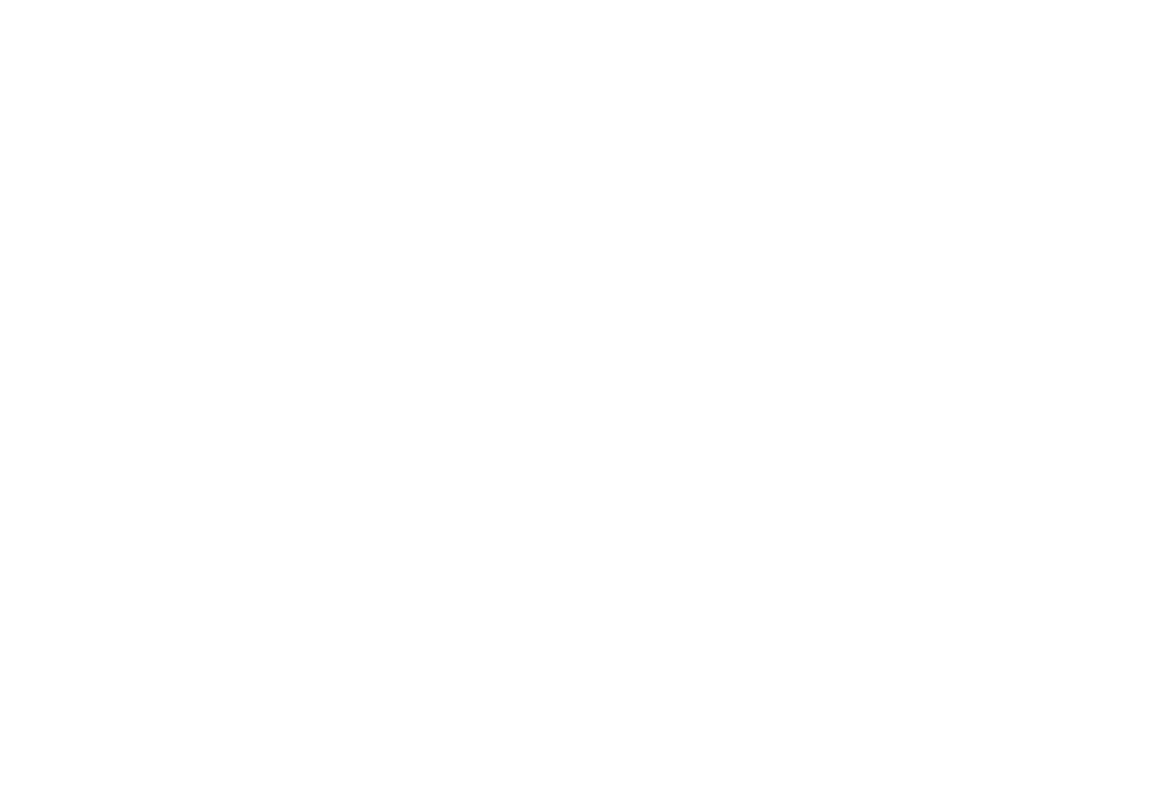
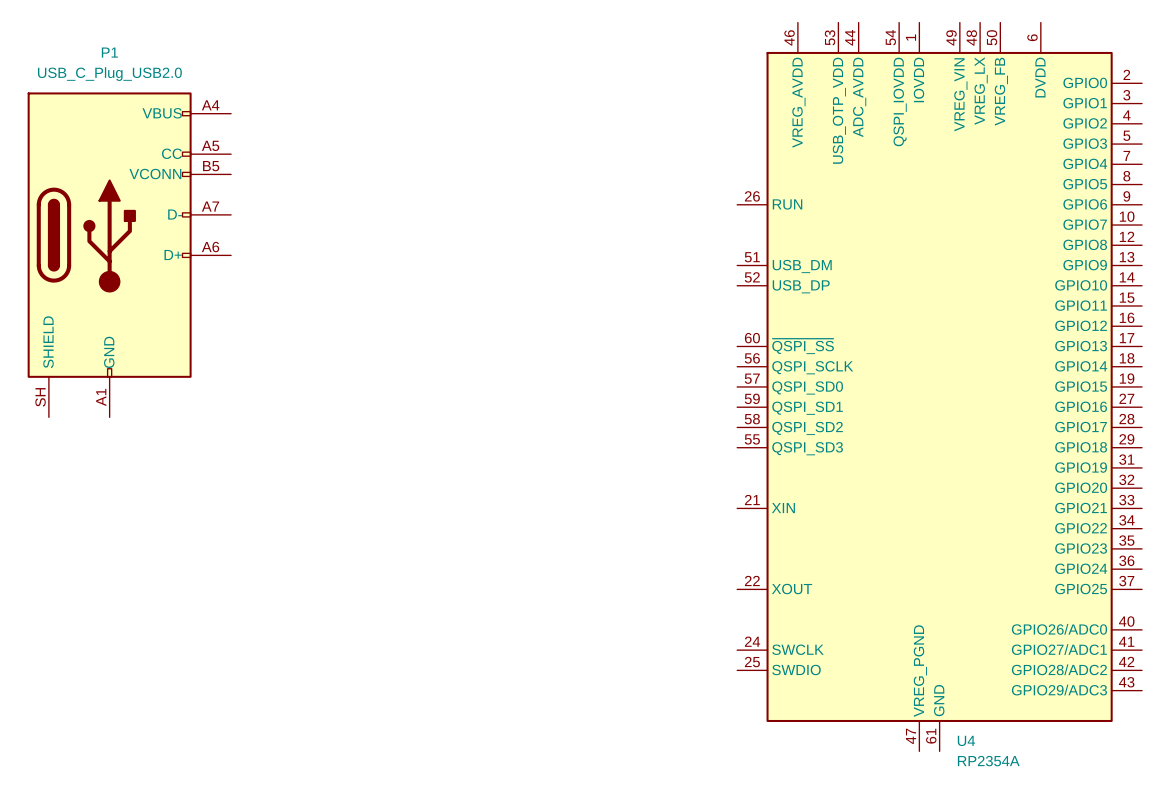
P1: none -> USB_C_Plug_USB2.0 (129, 254)
U4: none -> RP2354A (939, 386)

